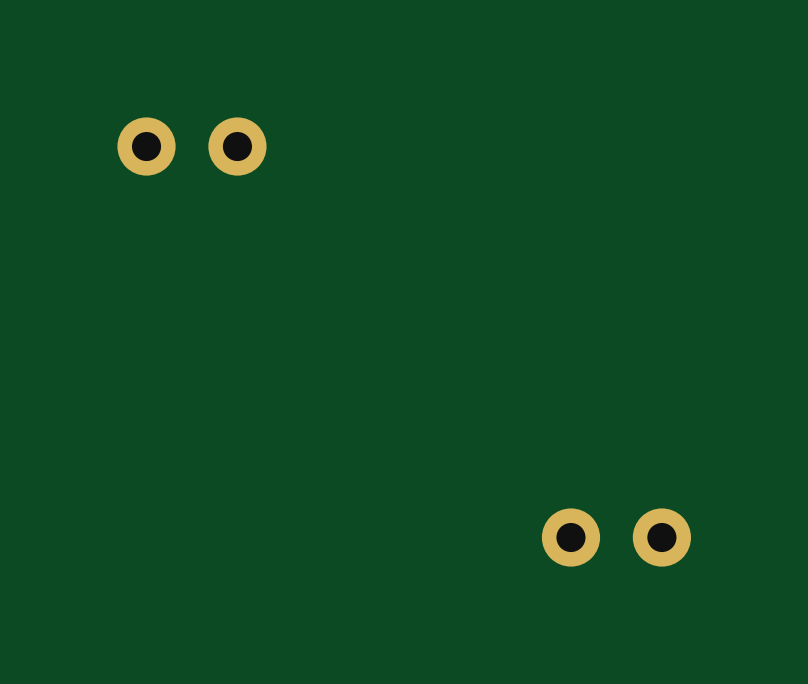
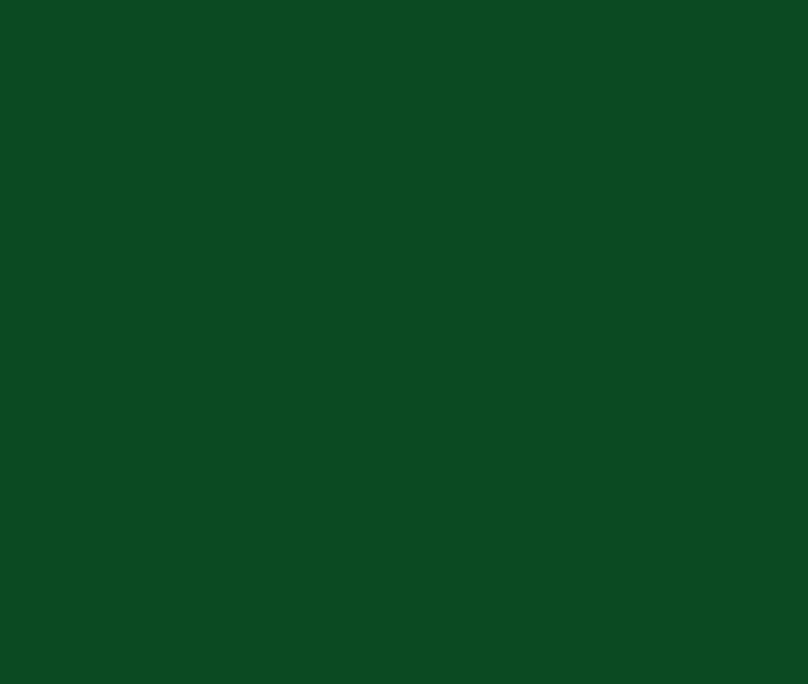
part: (191, 146) -> none
part: (616, 537) -> none

